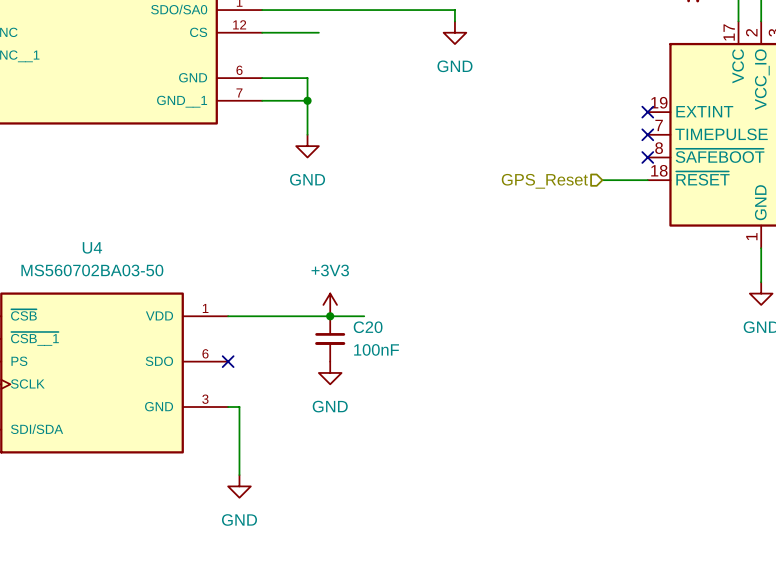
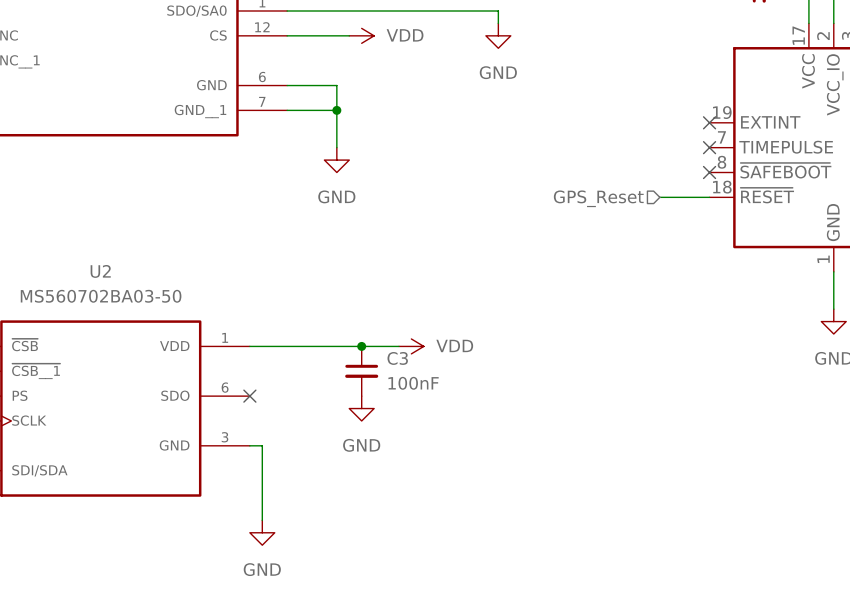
power symbol: none -> VDD (361, 35)
U4 name: U4 (92, 247) -> U2 (100, 271)
power symbol: +3V3 (330, 304) -> none
power symbol: none -> VDD (411, 346)
C20 name: C20 (368, 327) -> C3 (397, 358)

